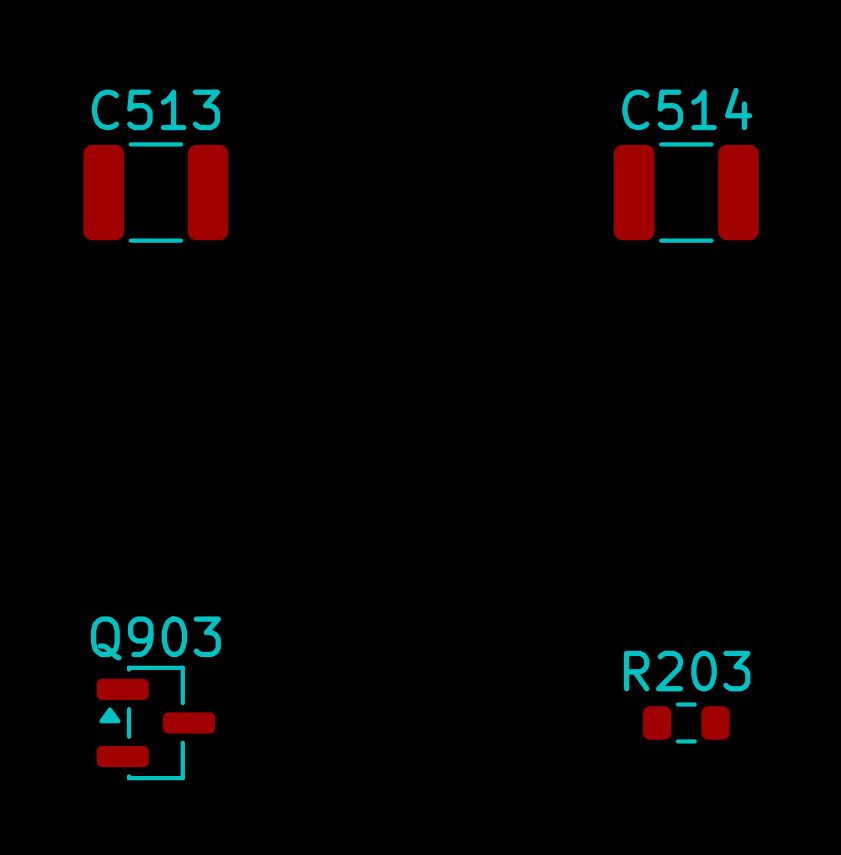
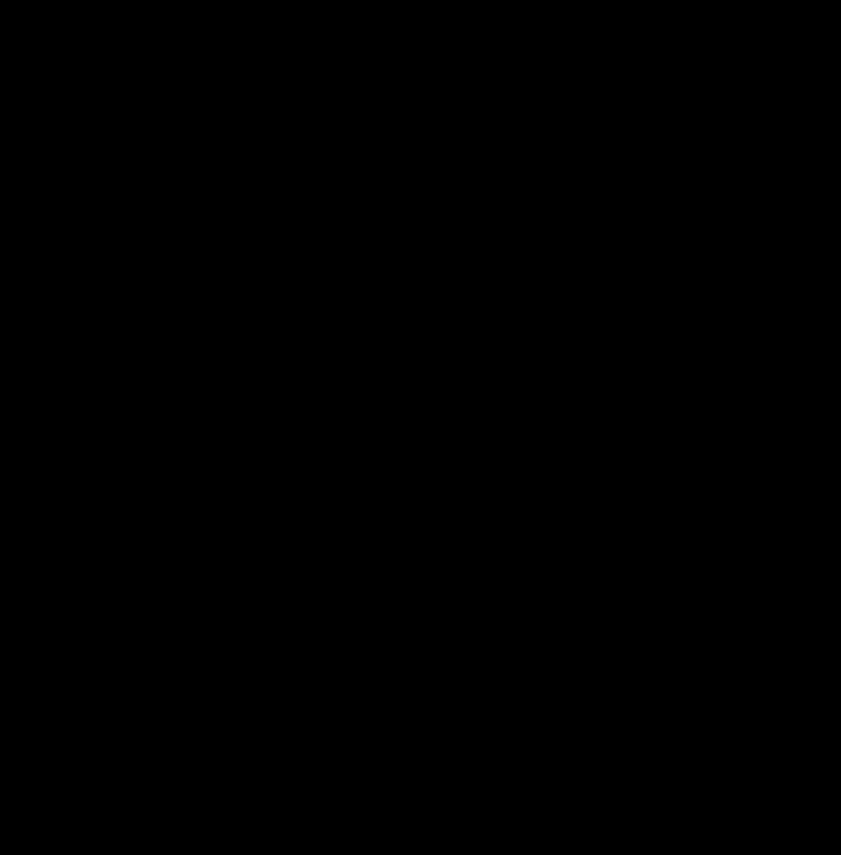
C513: (155, 192) -> none
C514: (686, 192) -> none
Q903: (155, 722) -> none
R203: (686, 722) -> none

